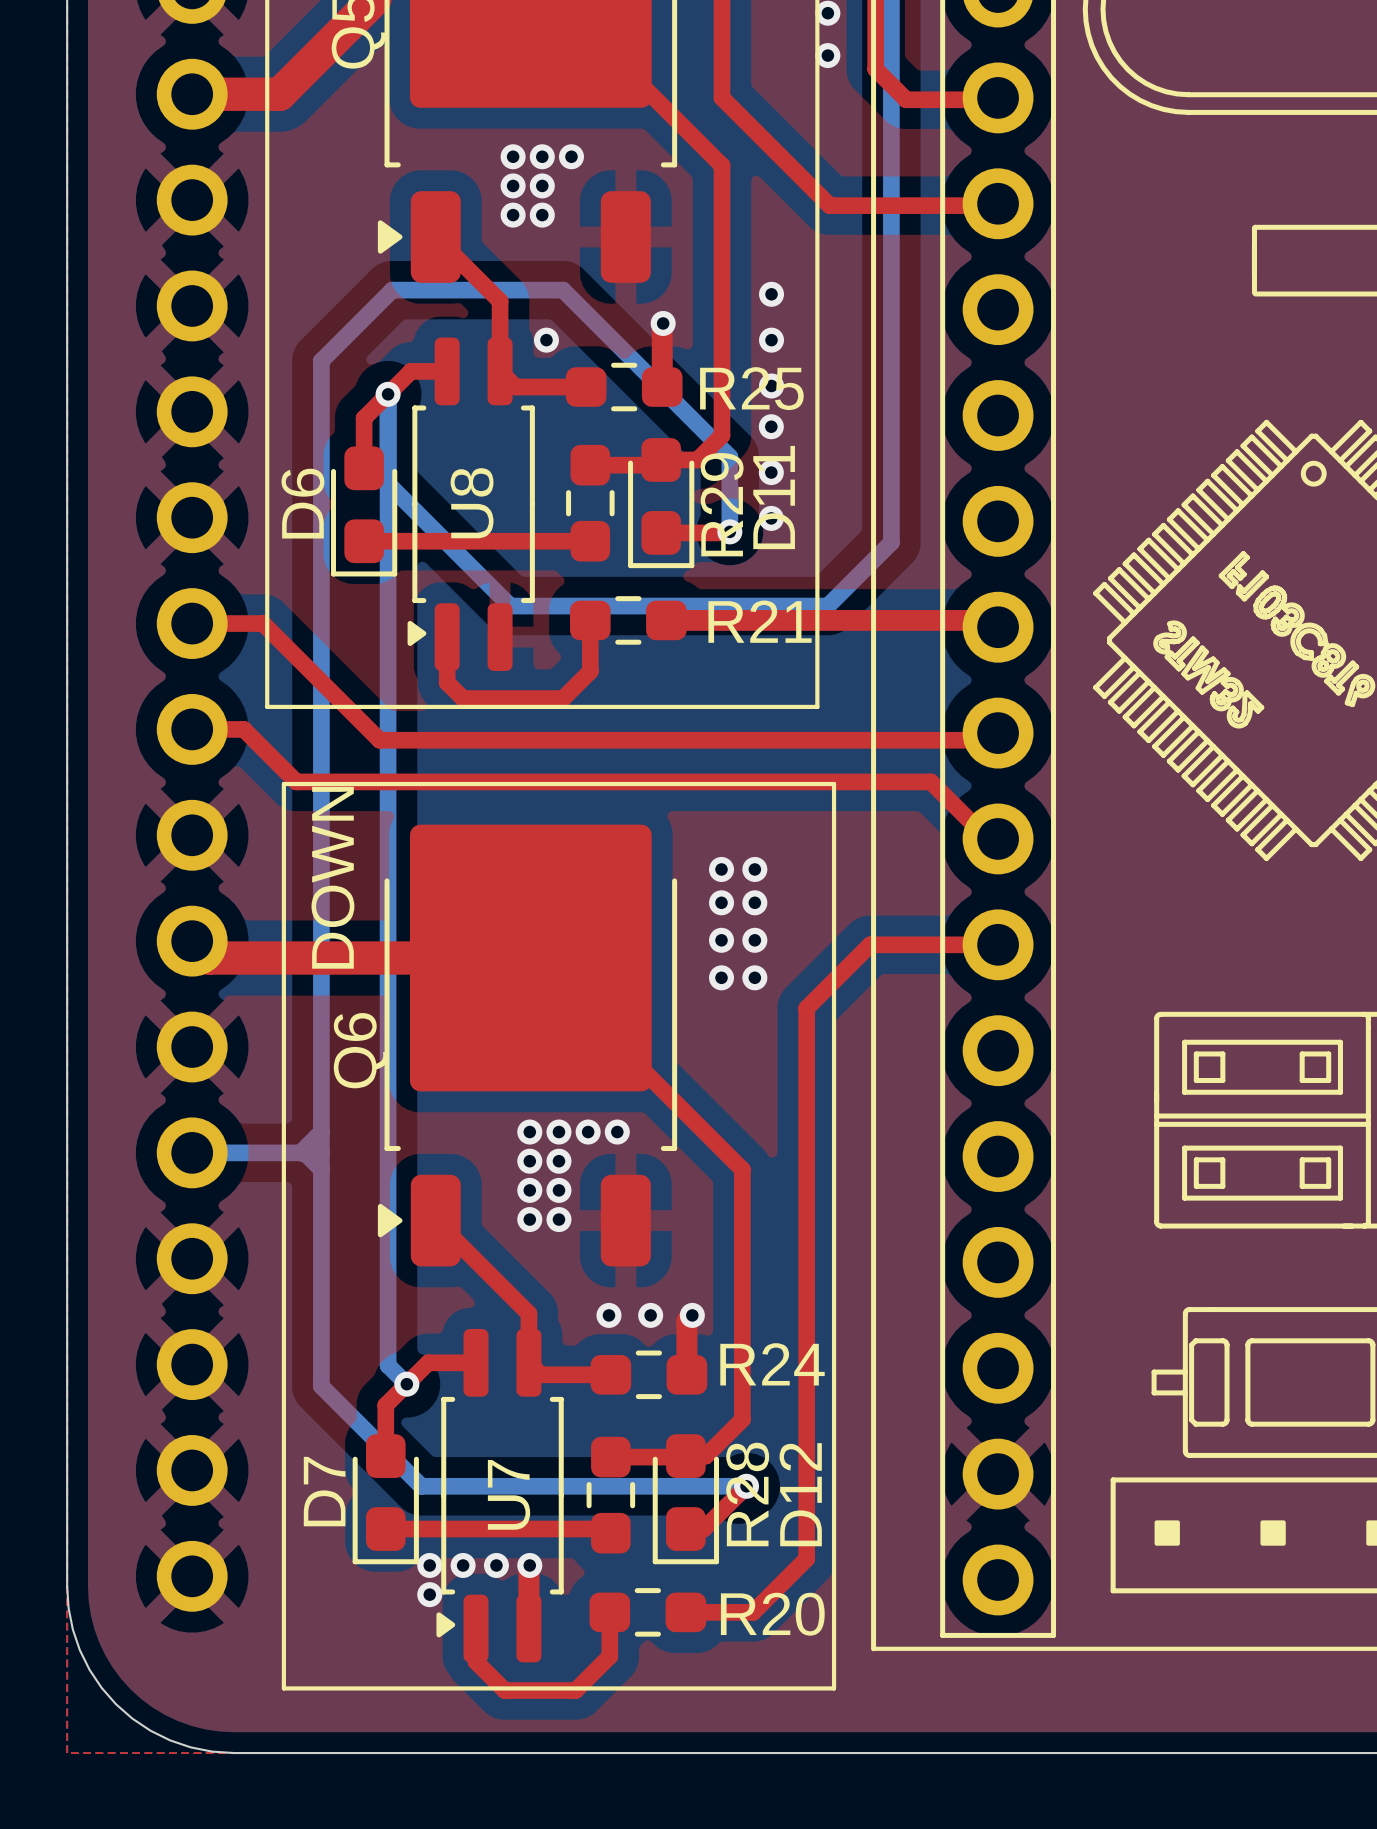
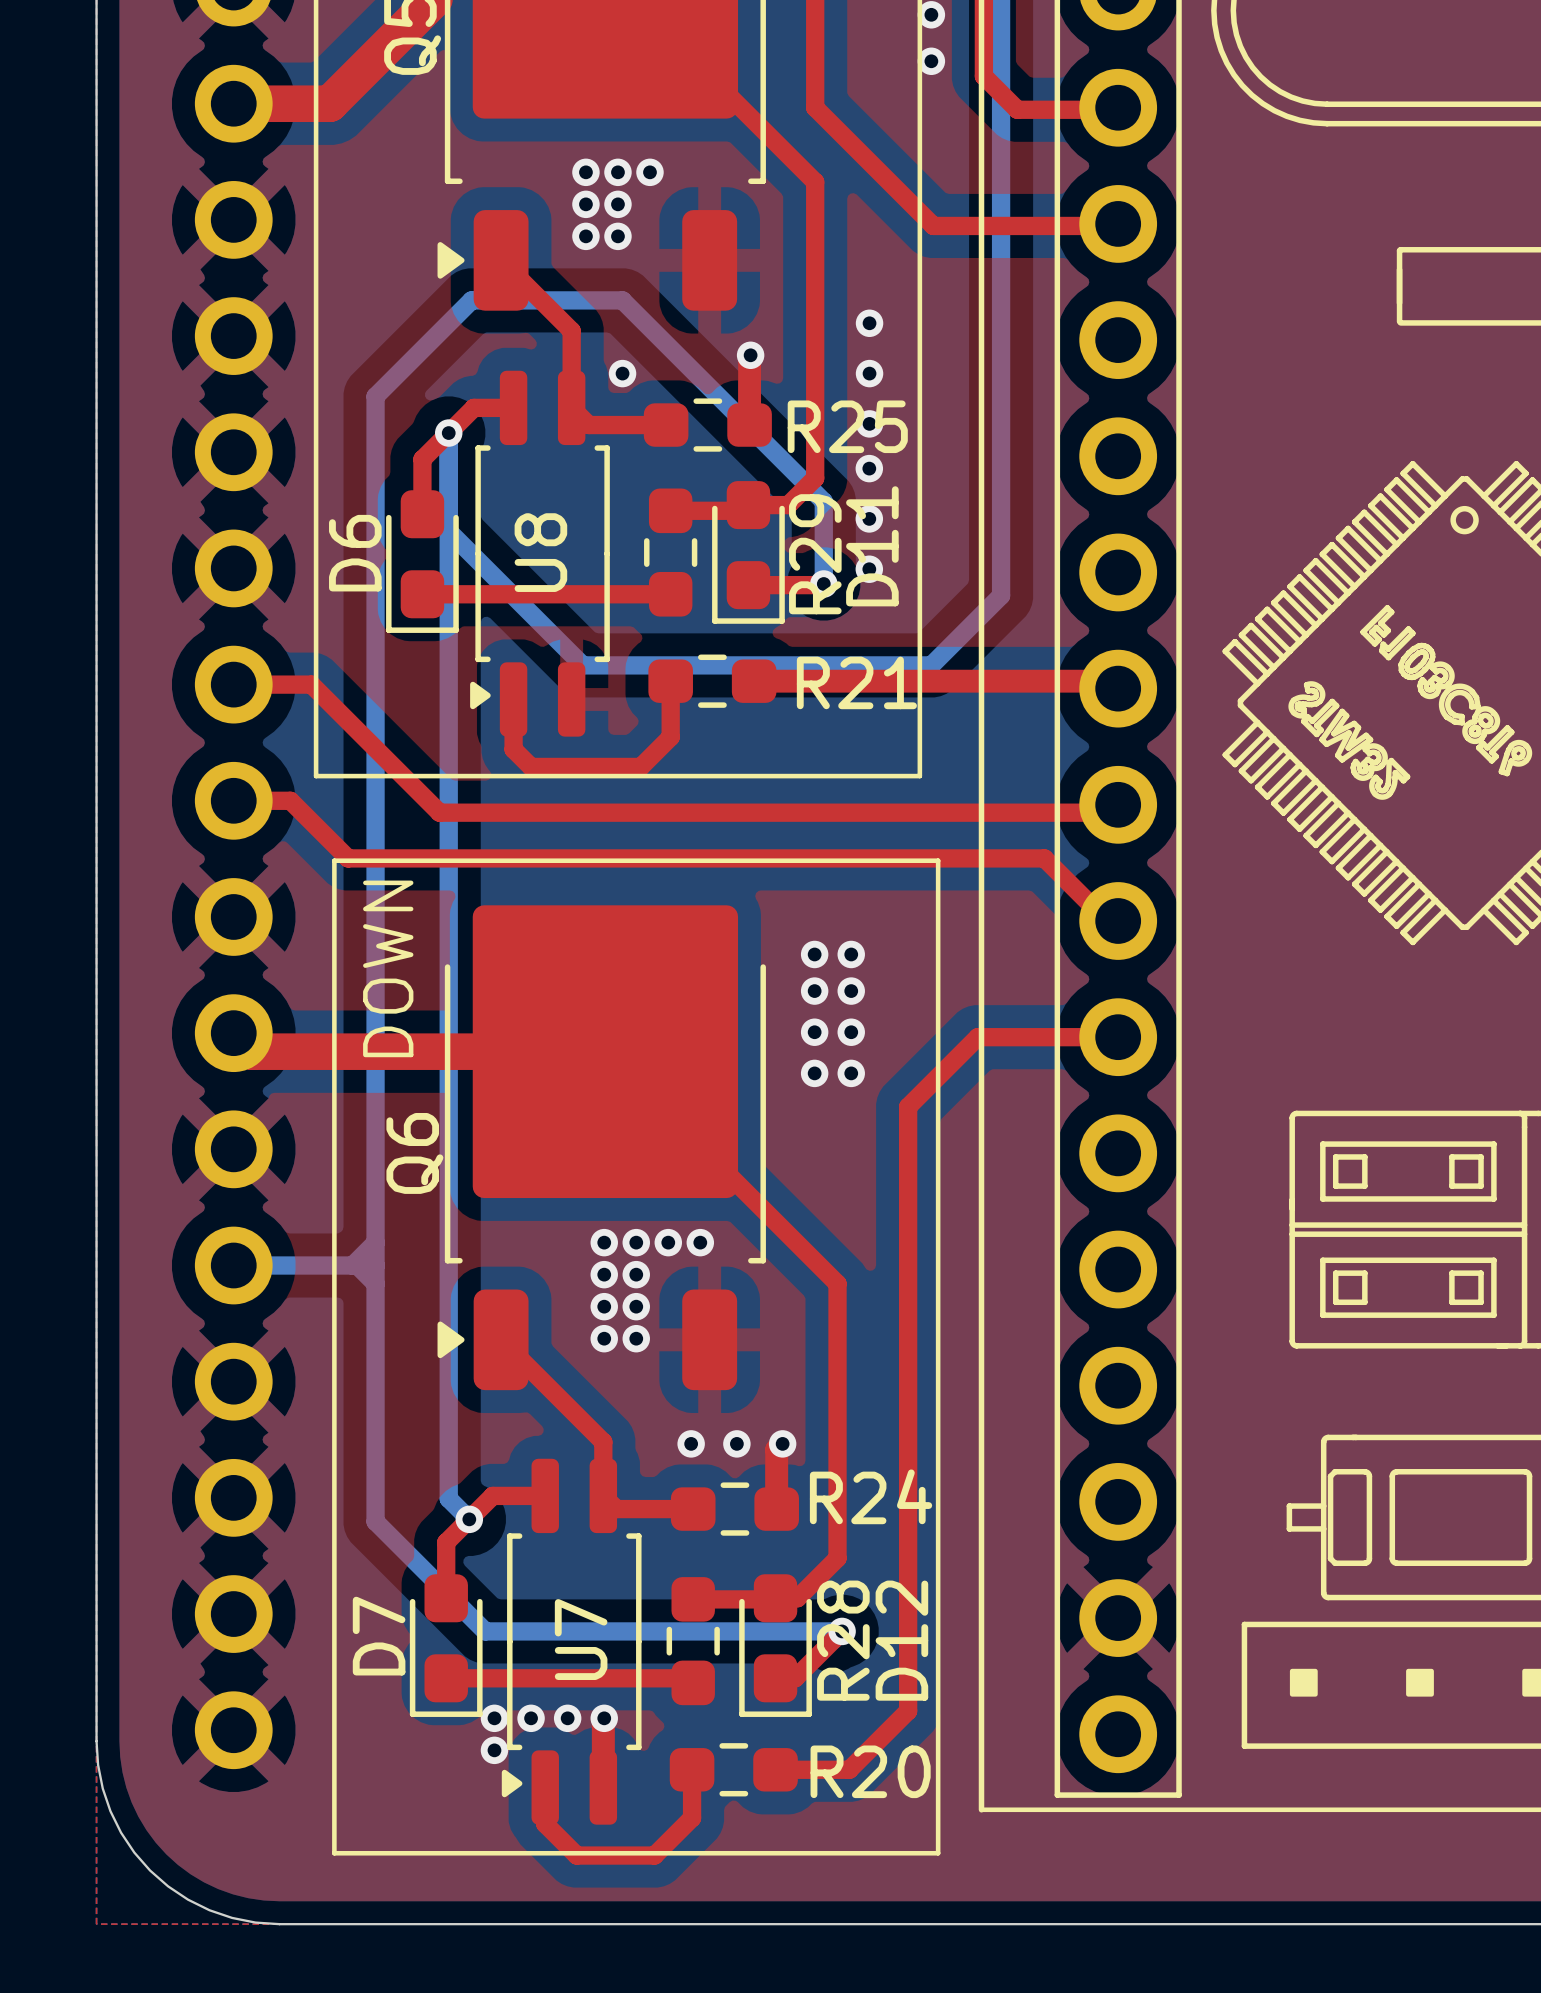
bottom track: (392, 290) (563, 290) -> (453, 318) (471, 300) (622, 300) (640, 318)

